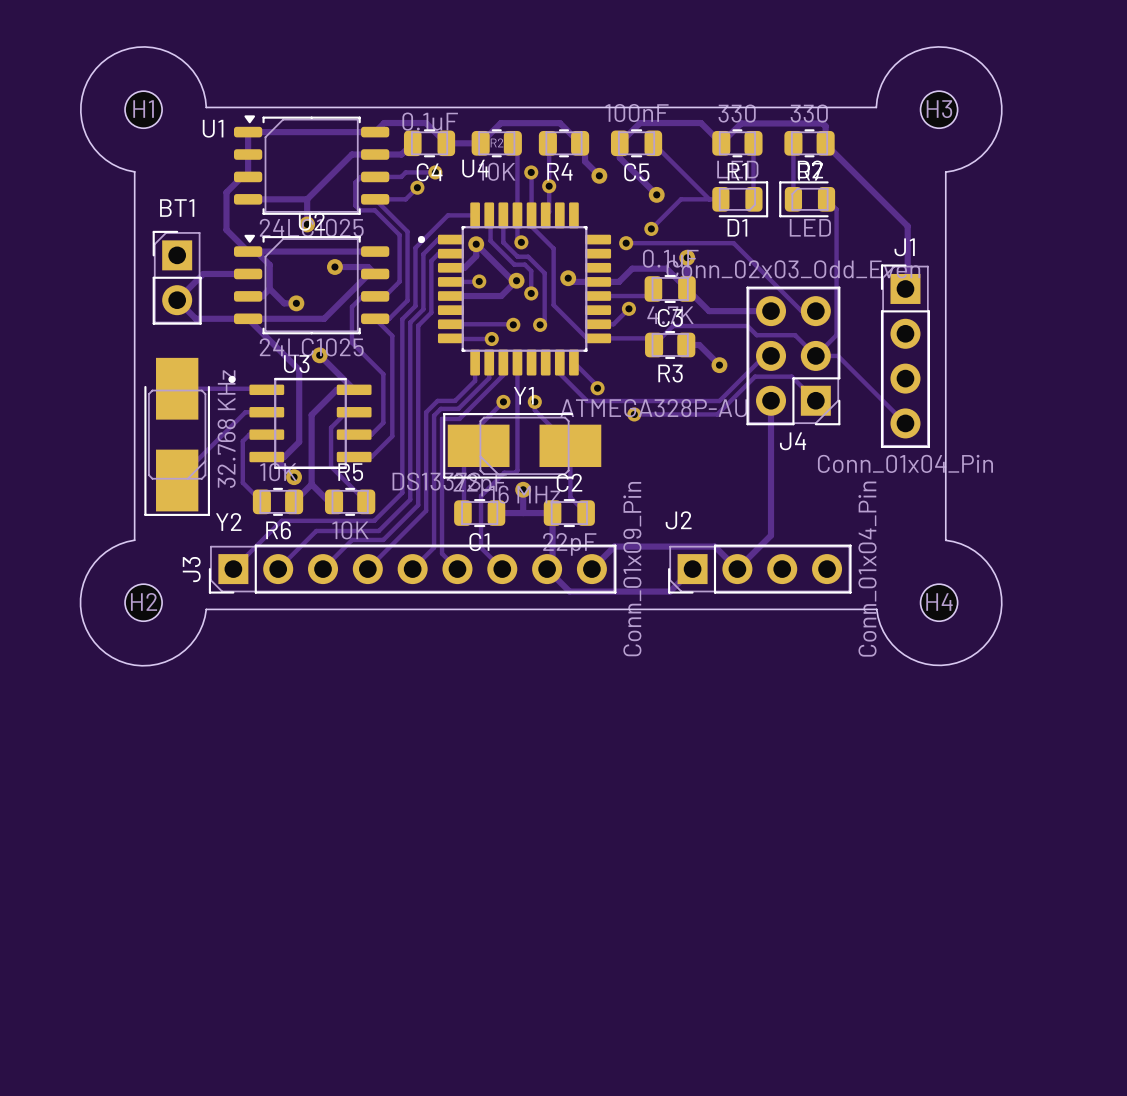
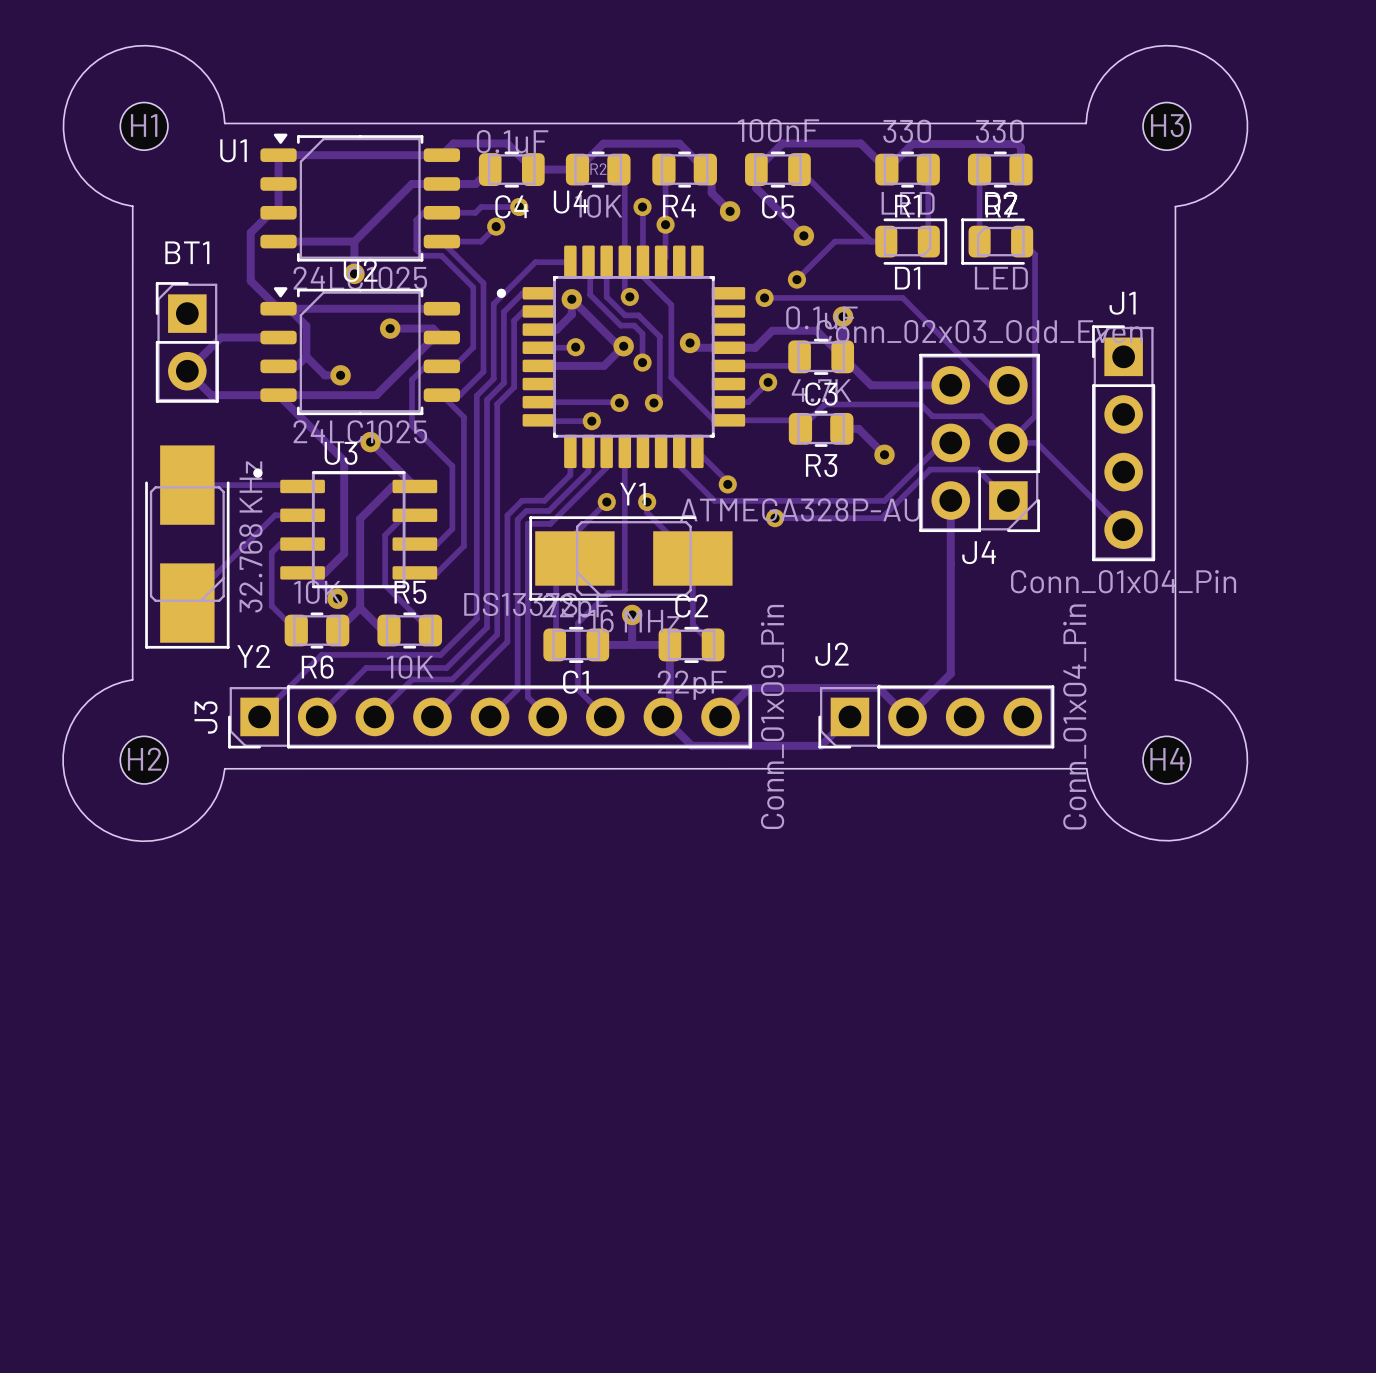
track: (825, 144) (907, 226) (907, 288) -> none

